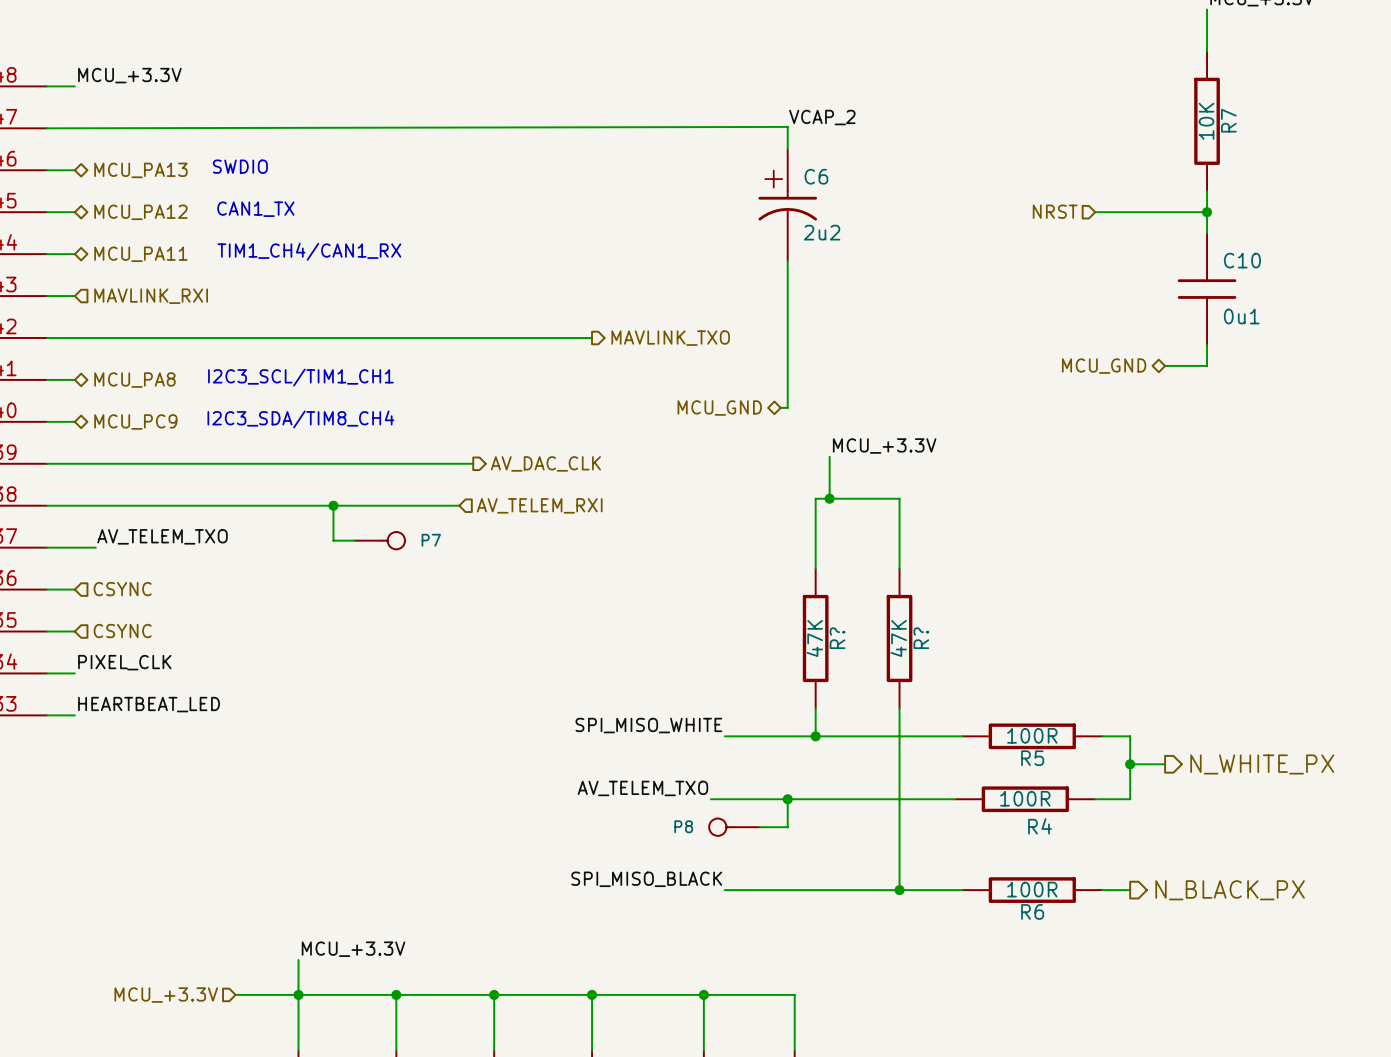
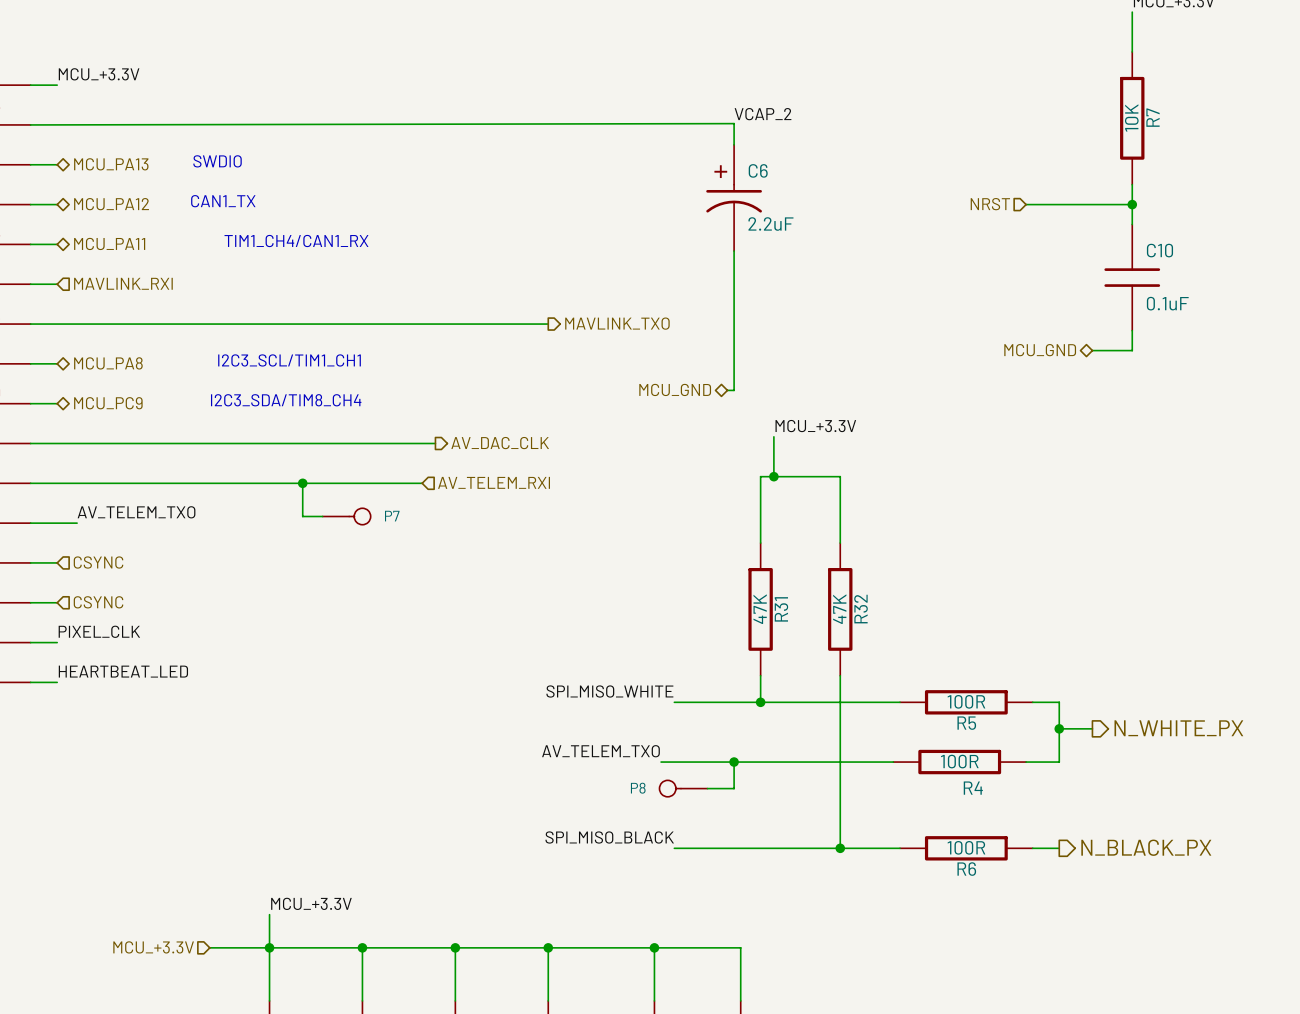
C6 value: 2u2 (822, 232) -> 2.2uF (770, 223)
C10 value: 0u1 (1241, 316) -> 0.1uF (1167, 303)
R? name: R? (837, 638) -> R31 (781, 609)
R? name: R? (921, 638) -> R32 (861, 609)

